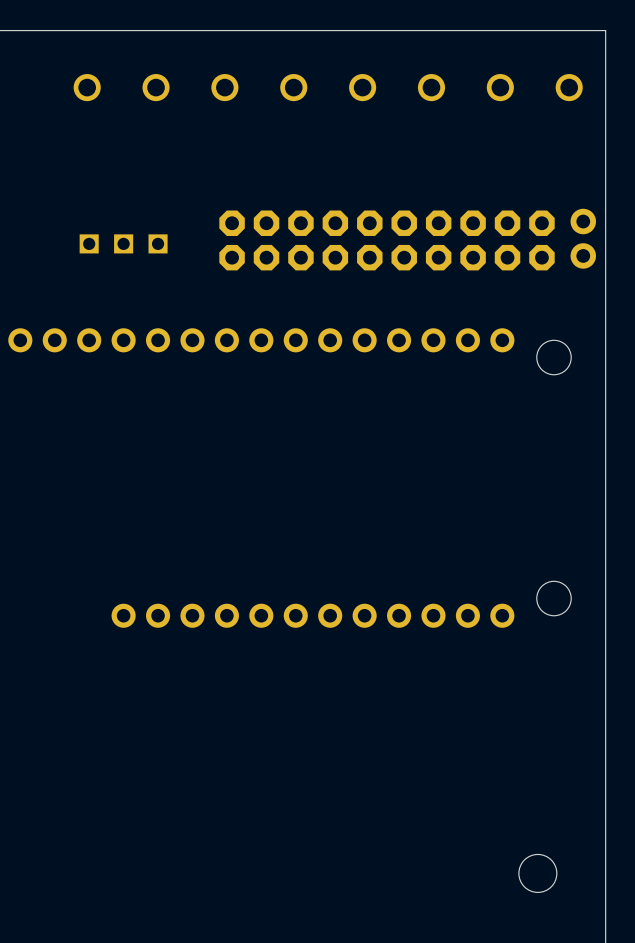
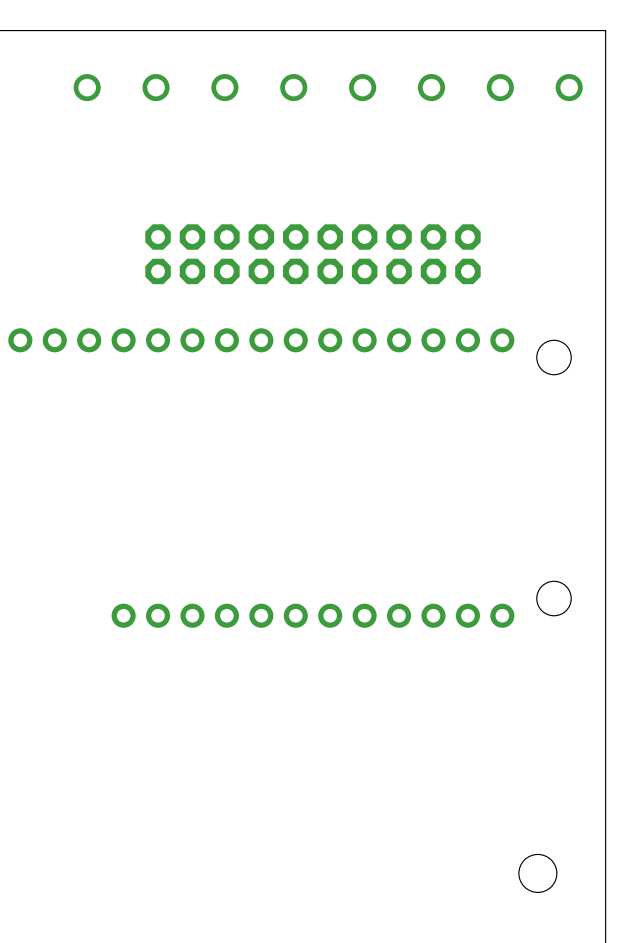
part: (583, 238) -> none
part position: (387, 240) -> (312, 254)
part: (123, 243) -> none

